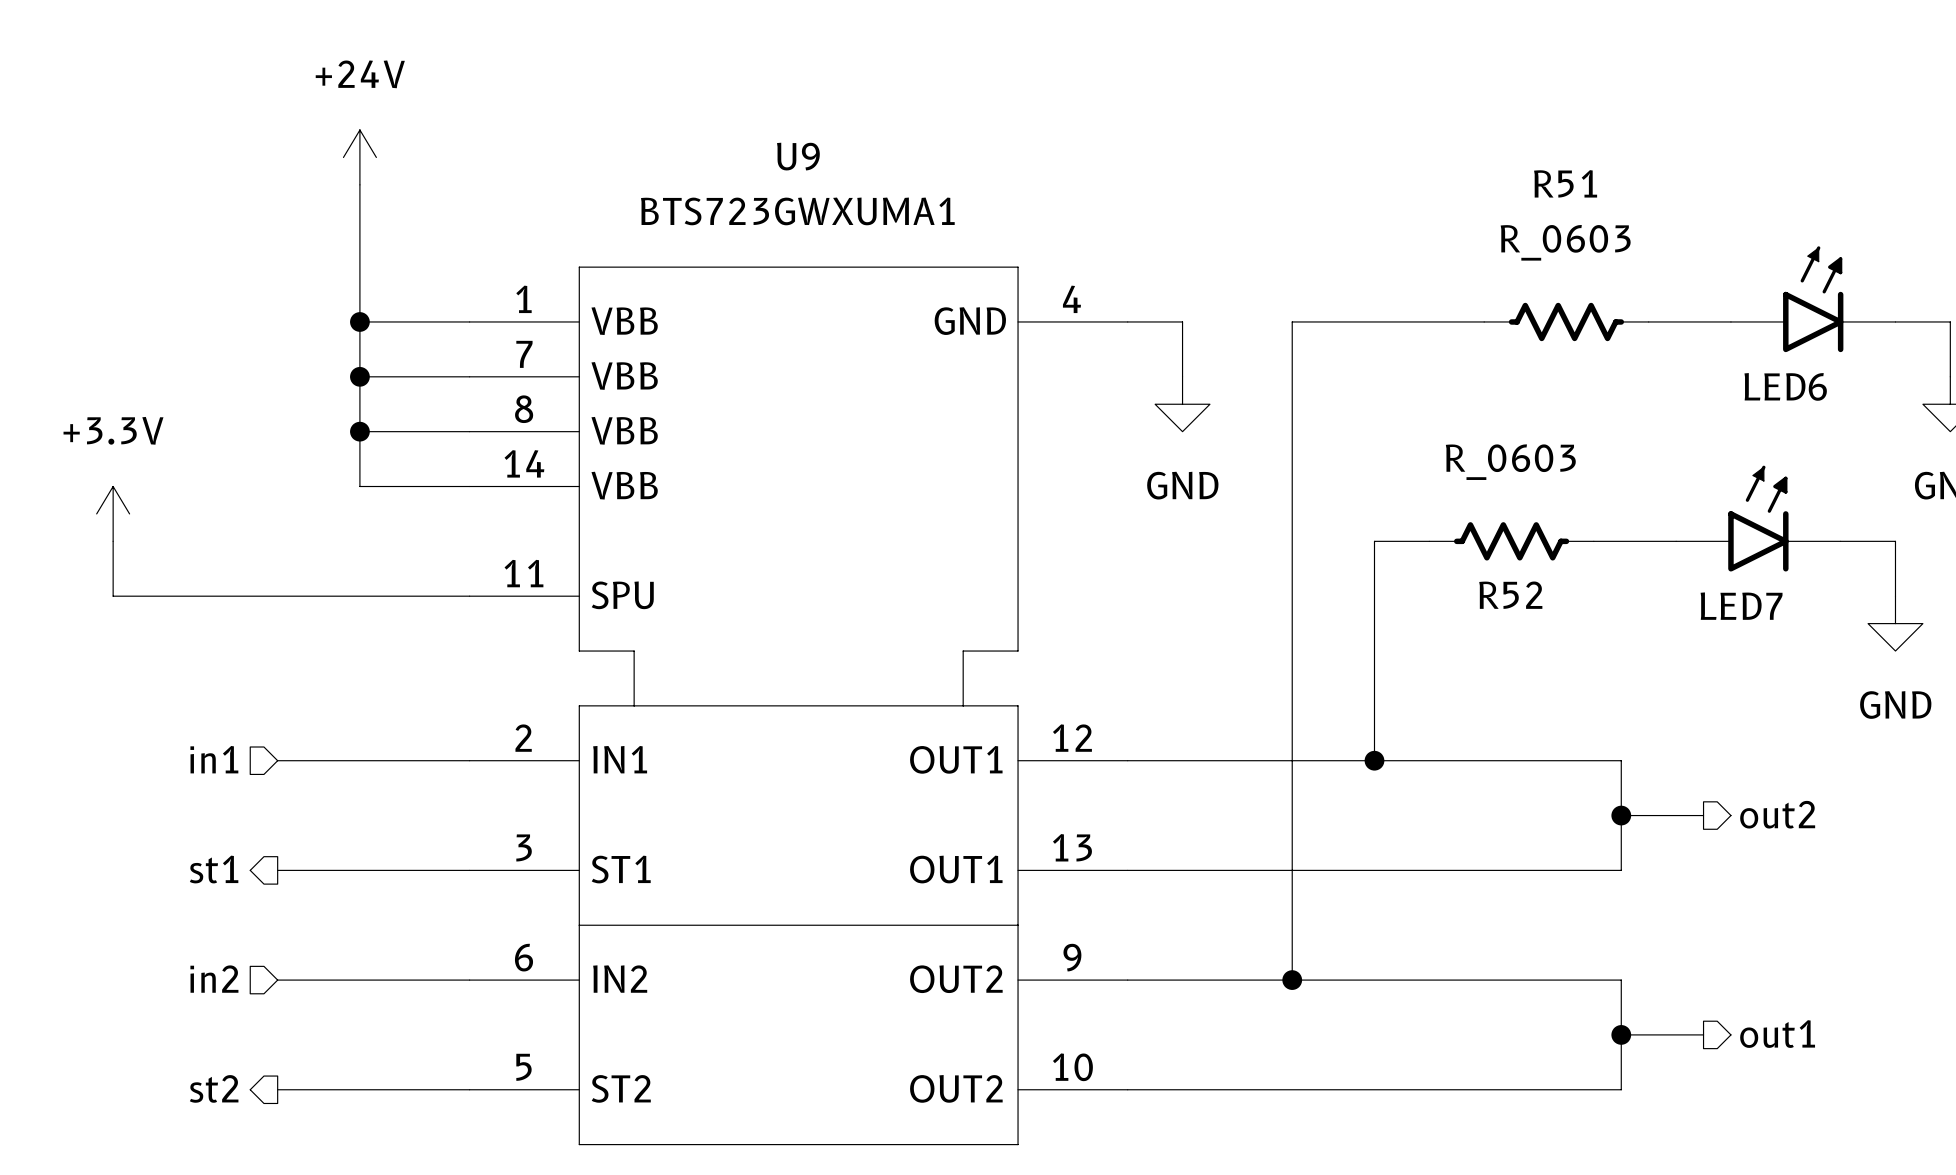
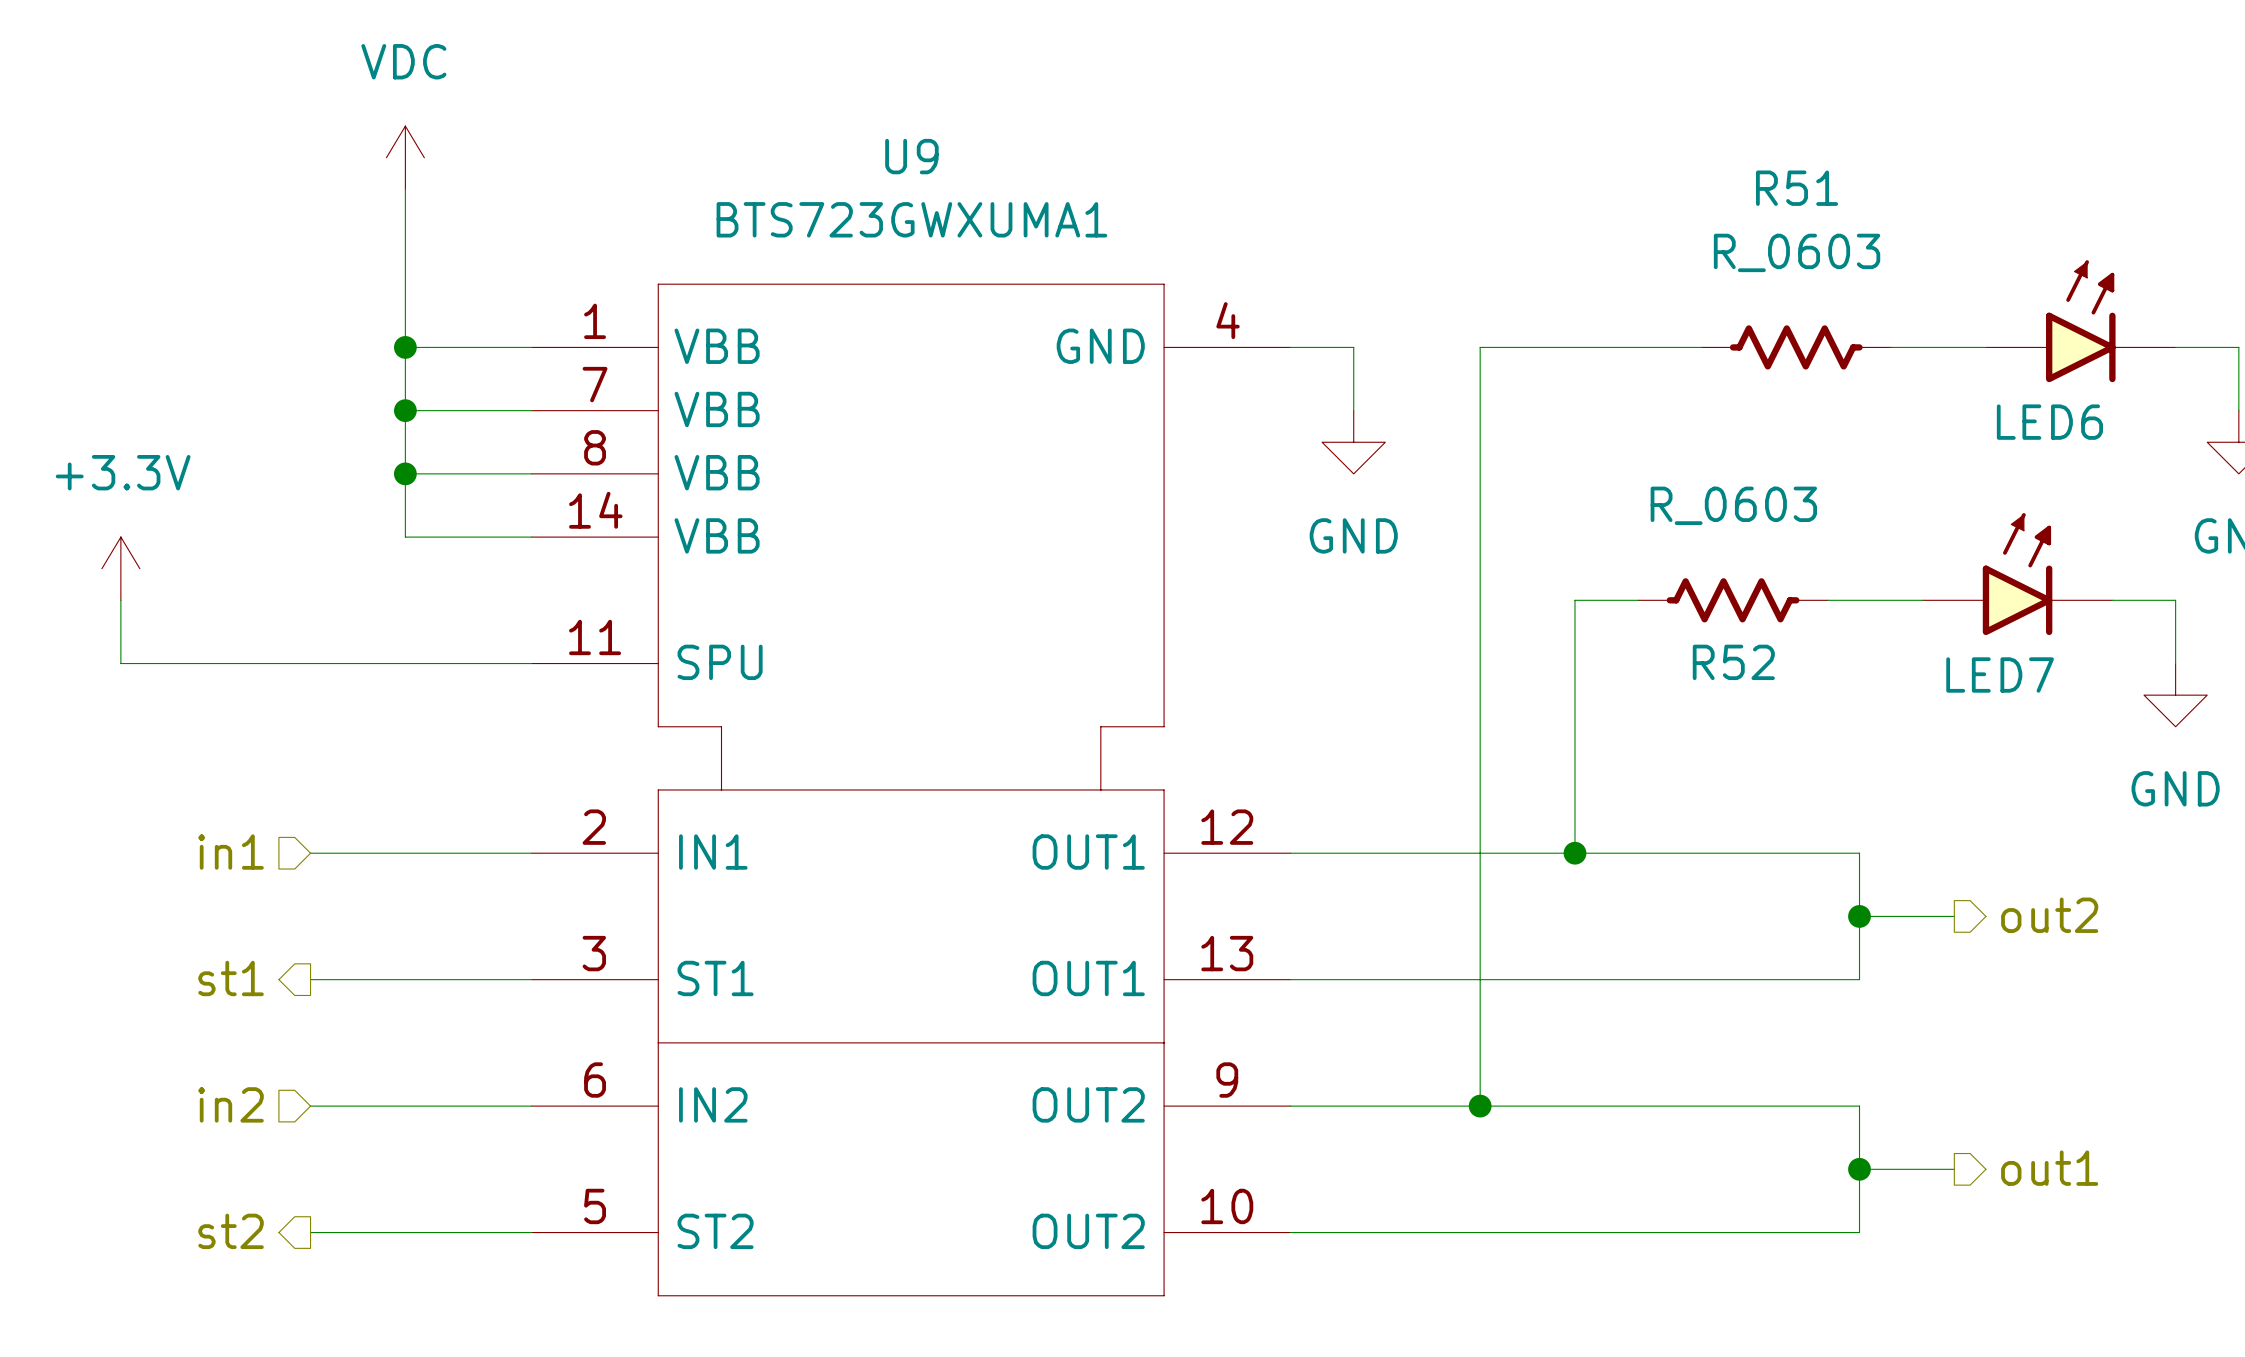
power symbol: +24V (359, 157) -> VDC (405, 157)

